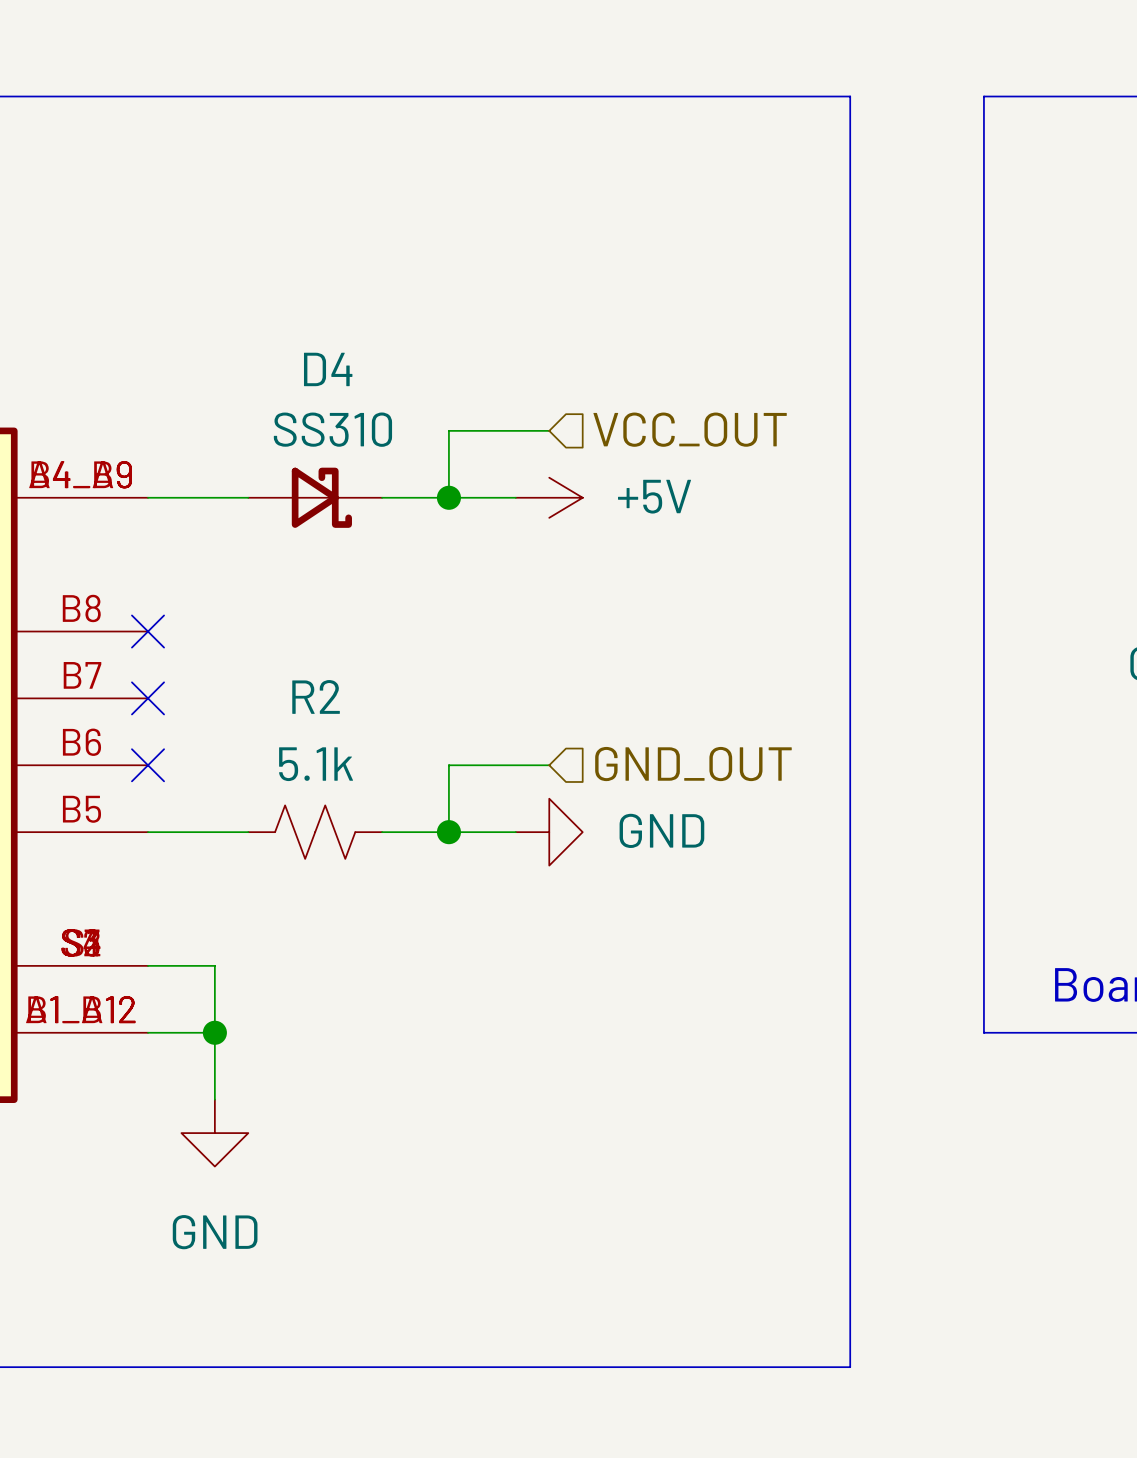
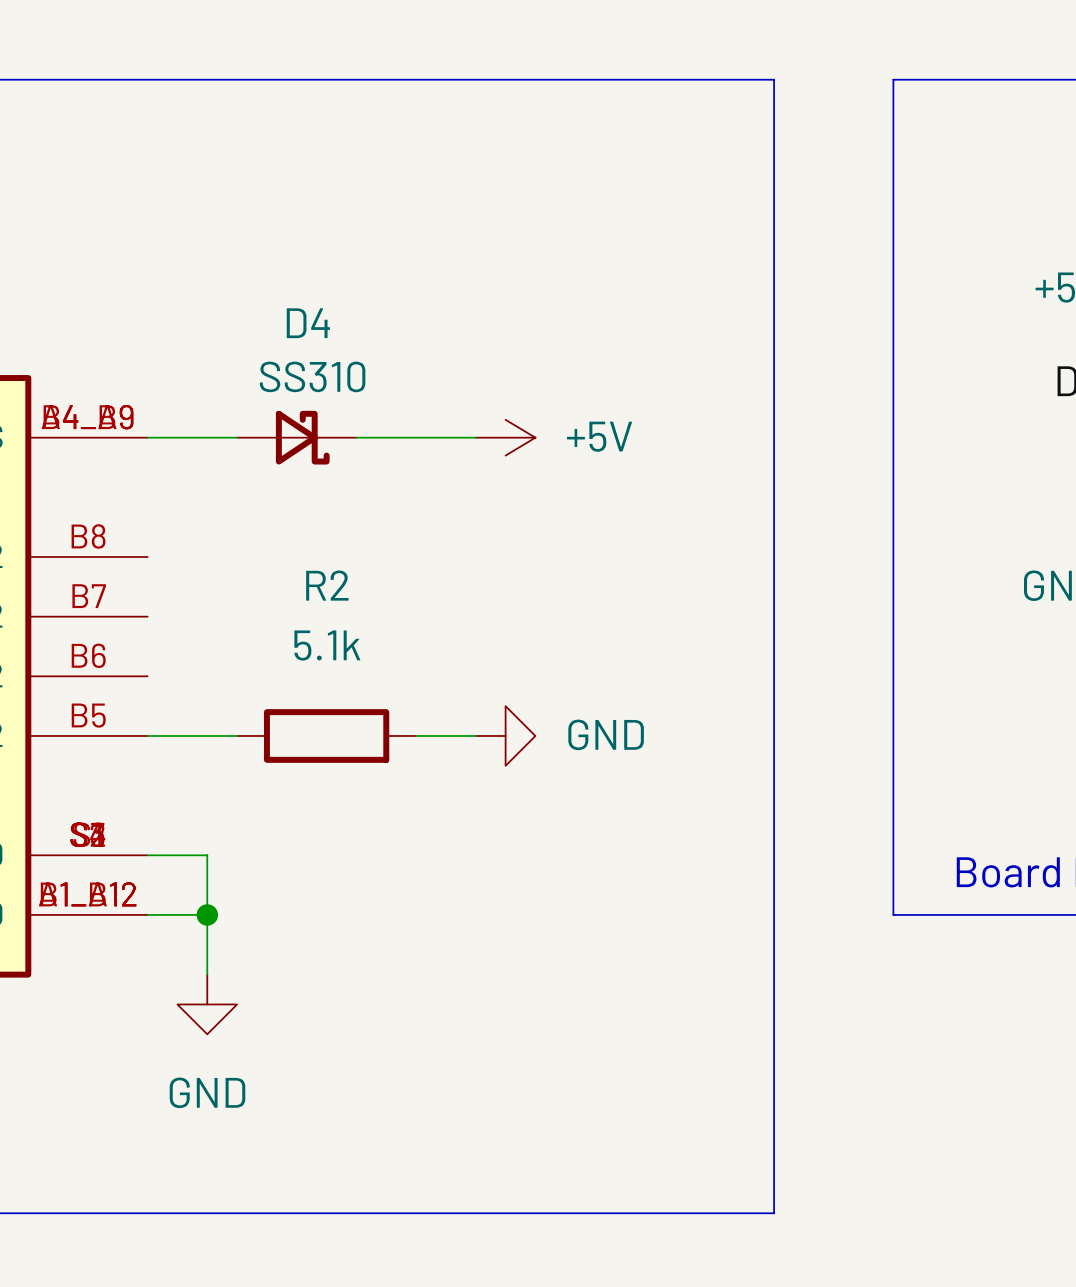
hierarchical label: VCC_OUT (690, 429) -> none
wire: (549, 430) (448, 430) (448, 497) -> none
junction: (448, 497) -> none
no-connect mark: (148, 631) -> none
no-connect mark: (148, 698) -> none
hierarchical label: GND_OUT (693, 764) -> none
no-connect mark: (148, 765) -> none
wire: (549, 765) (448, 765) (448, 832) (382, 832) -> none
R2 symbol: [248, 805, 383, 859] -> [237, 709, 417, 763]
junction: (448, 832) -> none

